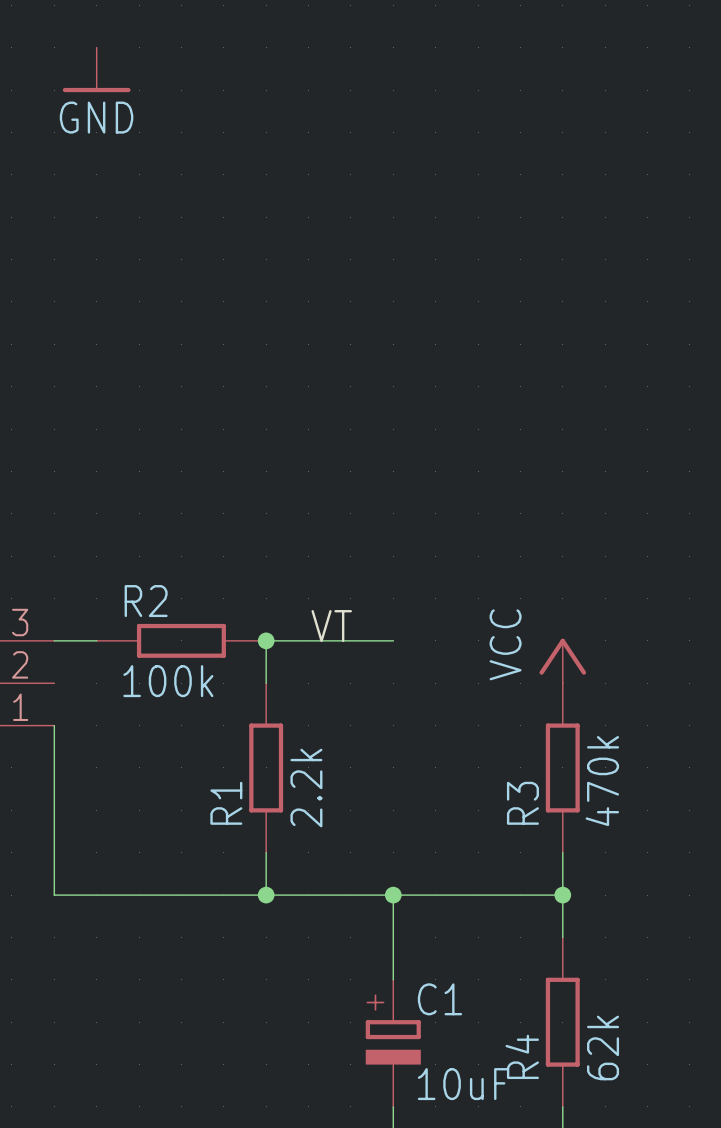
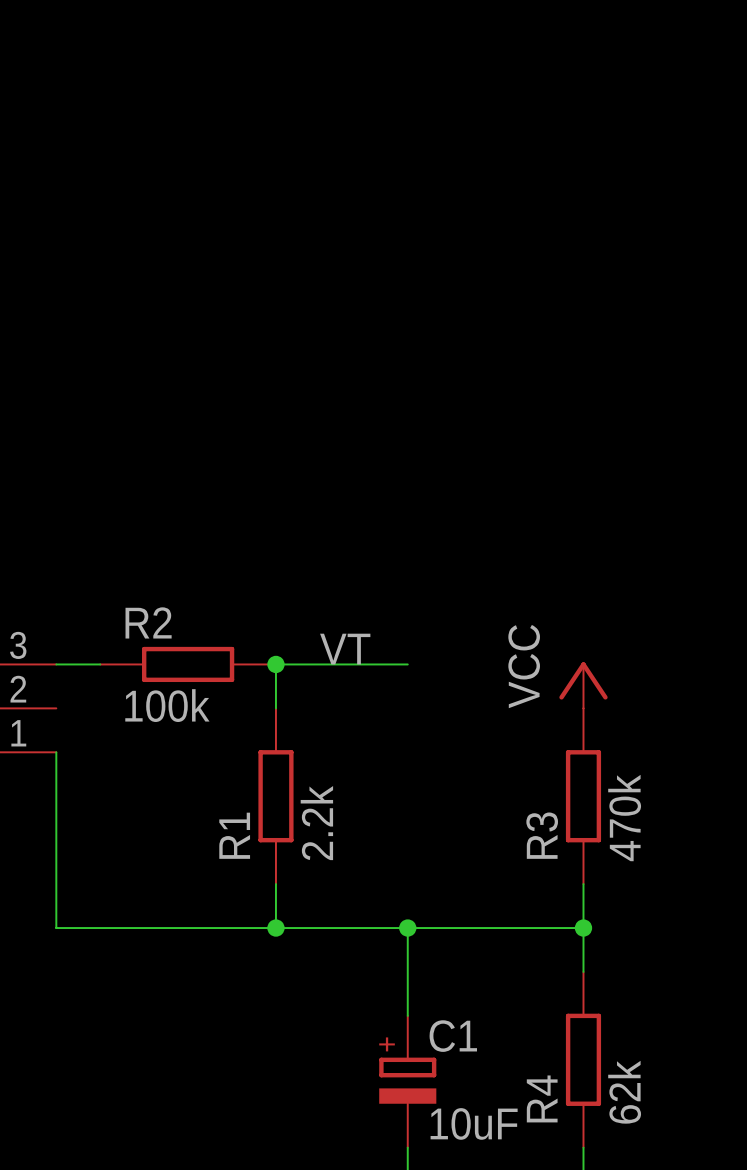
power symbol: GND (96, 69) -> none

